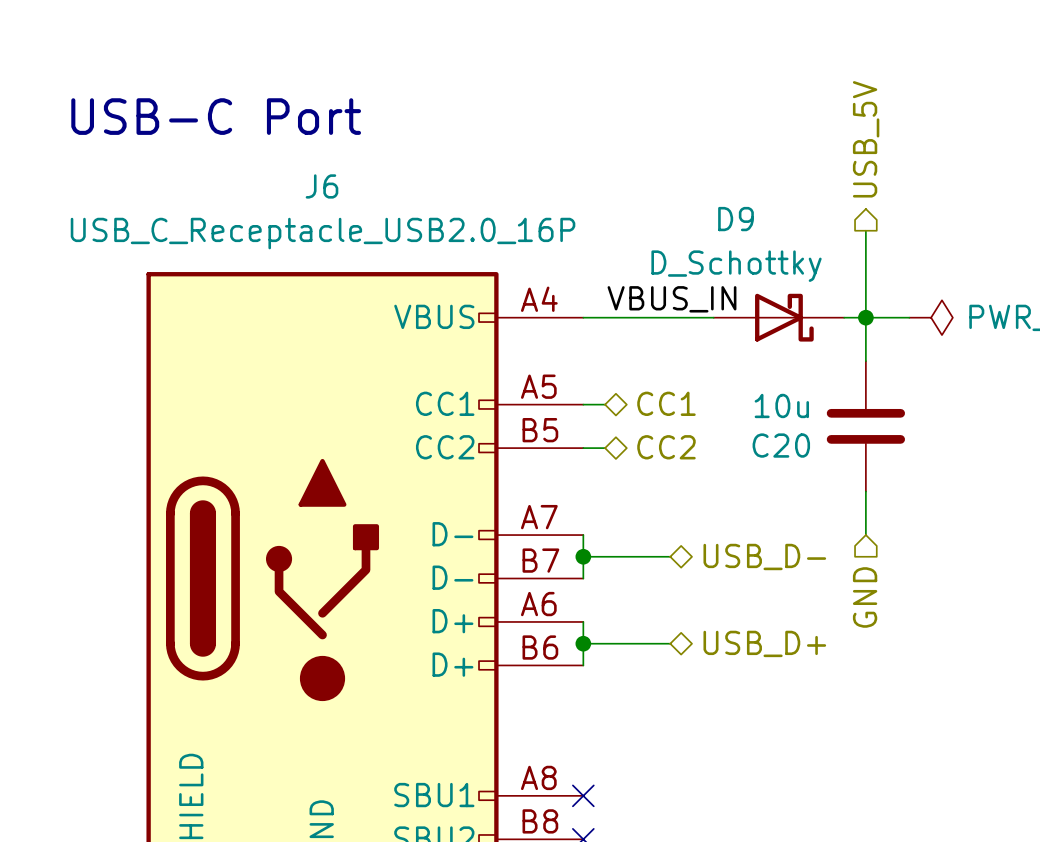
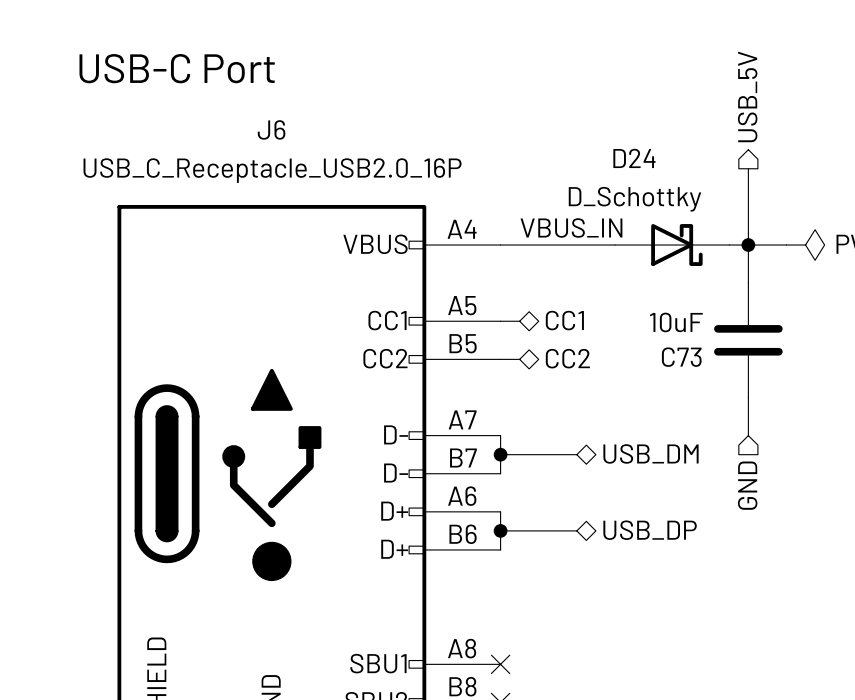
D9 name: D9 (736, 219) -> D24 (634, 158)
C20 value: 10u (781, 405) -> 10uF (676, 322)
C20 name: C20 (781, 445) -> C73 (681, 357)
hierarchical label: USB_D- (764, 556) -> USB_DM (650, 453)
hierarchical label: USB_D+ (764, 643) -> USB_DP (650, 530)

